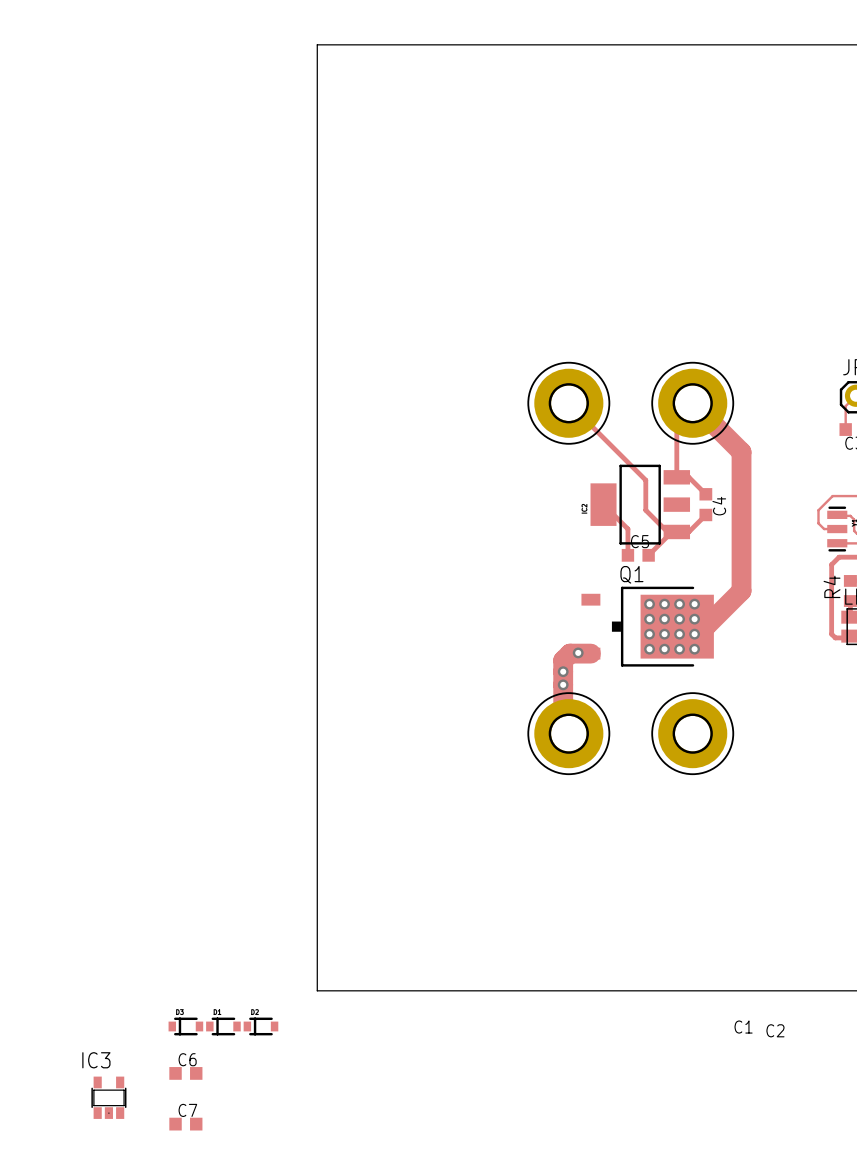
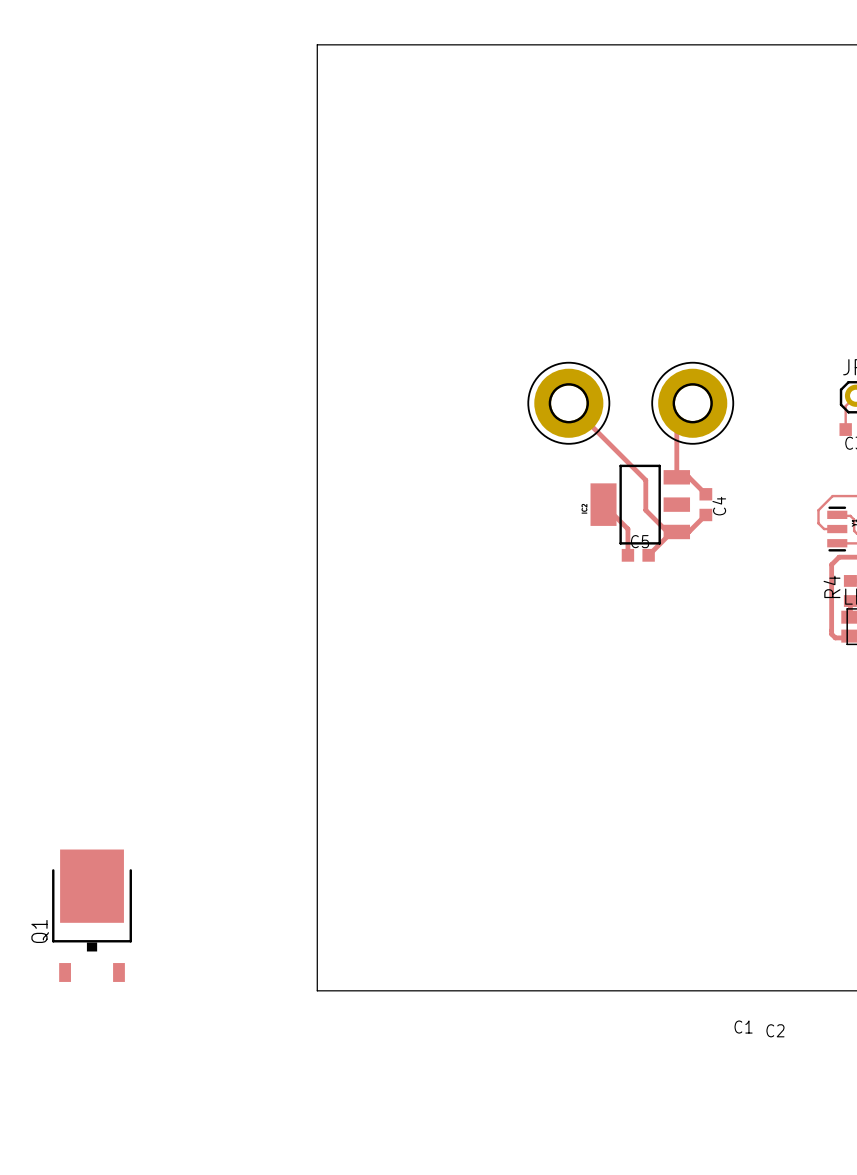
track: (692, 403) (741, 452) (741, 590) (705, 626) (677, 626) -> none
via: (649, 604) -> none
via: (664, 604) -> none
via: (679, 604) -> none
via: (694, 604) -> none
via: (649, 619) -> none
via: (664, 619) -> none
via: (679, 619) -> none
via: (694, 619) -> none
Q1 rotation: 0° (647, 626) -> 90° counterclockwise (92, 915)
Q1 position: (647, 626) -> (92, 915)
via: (649, 634) -> none
via: (664, 634) -> none
via: (679, 634) -> none
via: (694, 634) -> none
via: (649, 649) -> none
via: (664, 649) -> none
via: (679, 649) -> none
via: (694, 649) -> none
via: (578, 652) -> none
track: (590, 653) (570, 653) (563, 660) (563, 728) (568, 733) -> none
via: (563, 671) -> none
via: (563, 684) -> none
part: (568, 733) -> none
part: (692, 733) -> none
part: (185, 1026) -> none
part: (223, 1026) -> none
part: (260, 1026) -> none
C6: (185, 1073) -> none
IC3: (108, 1097) -> none
C7: (185, 1124) -> none

